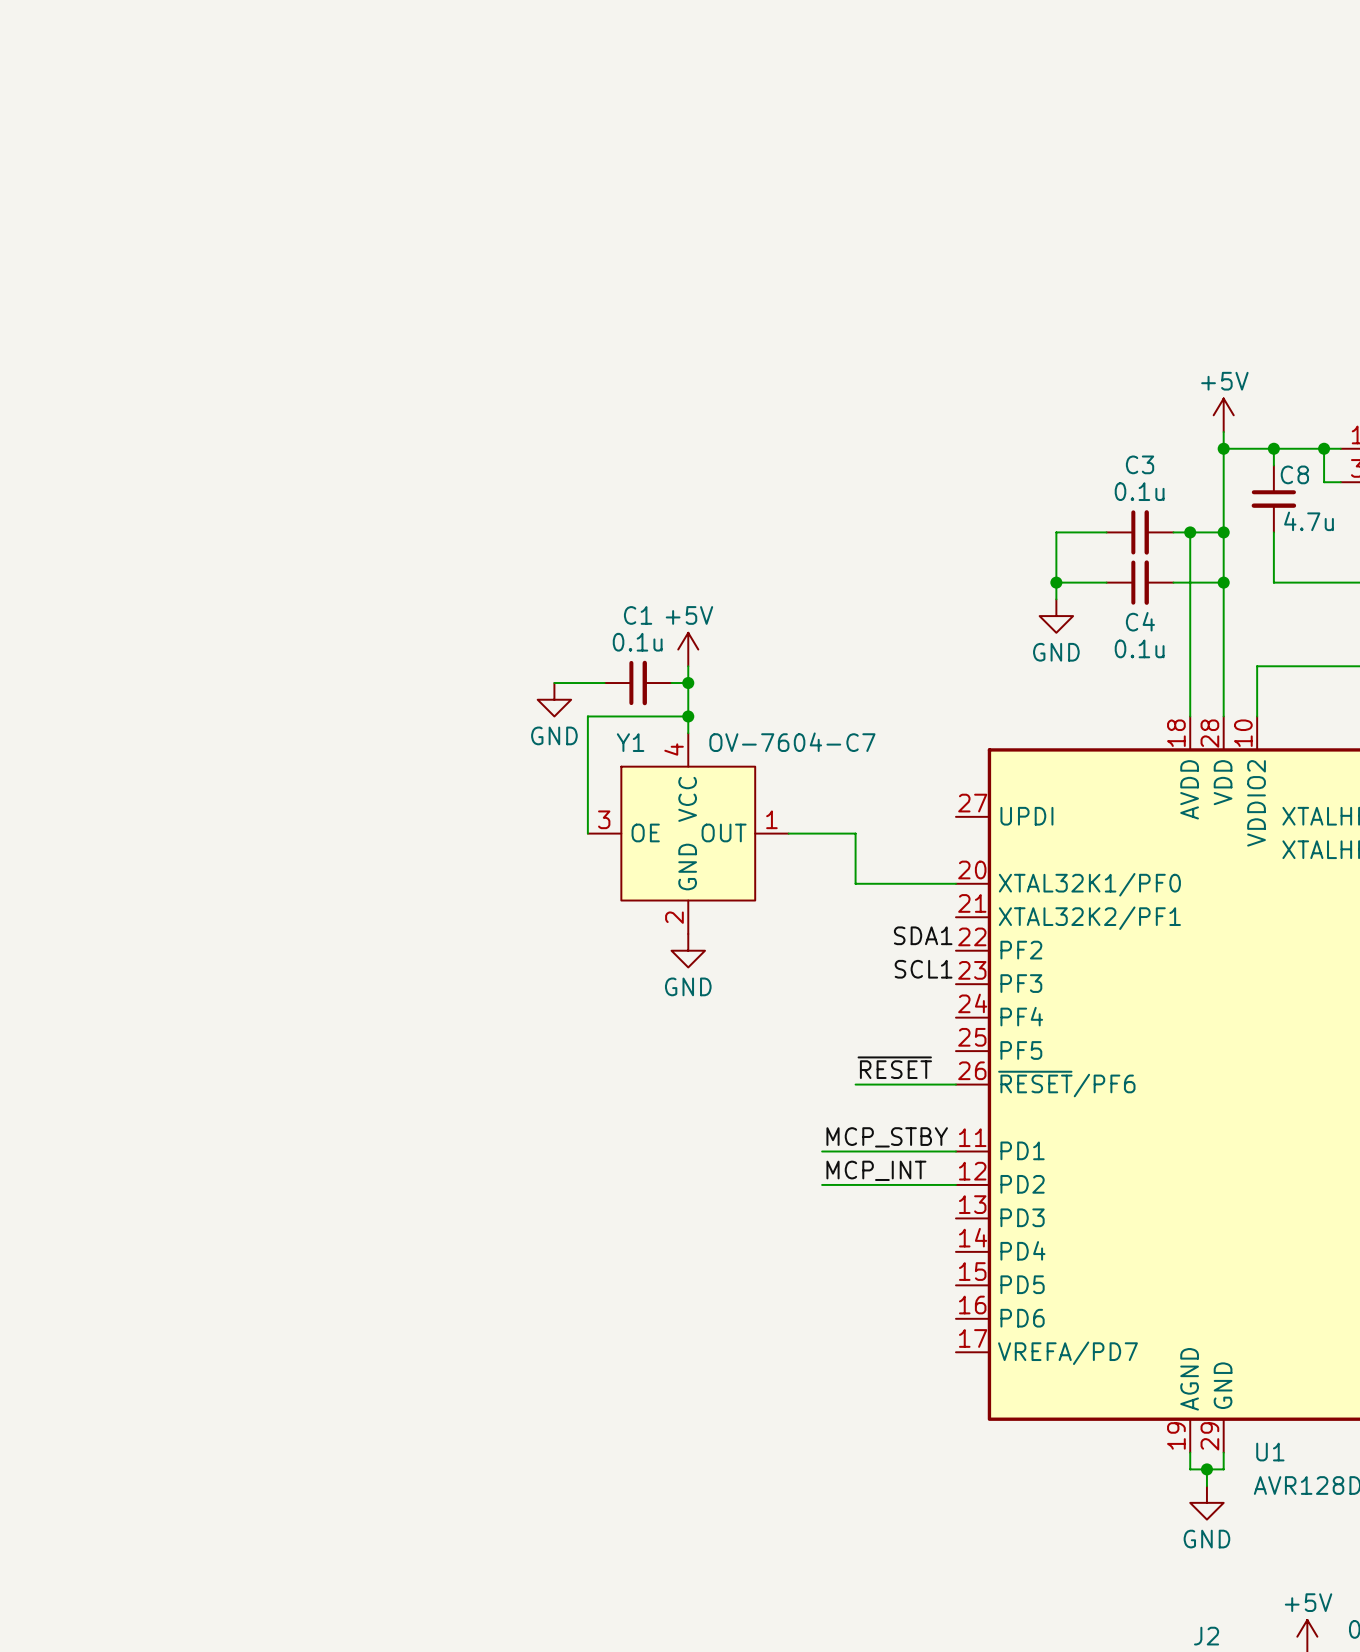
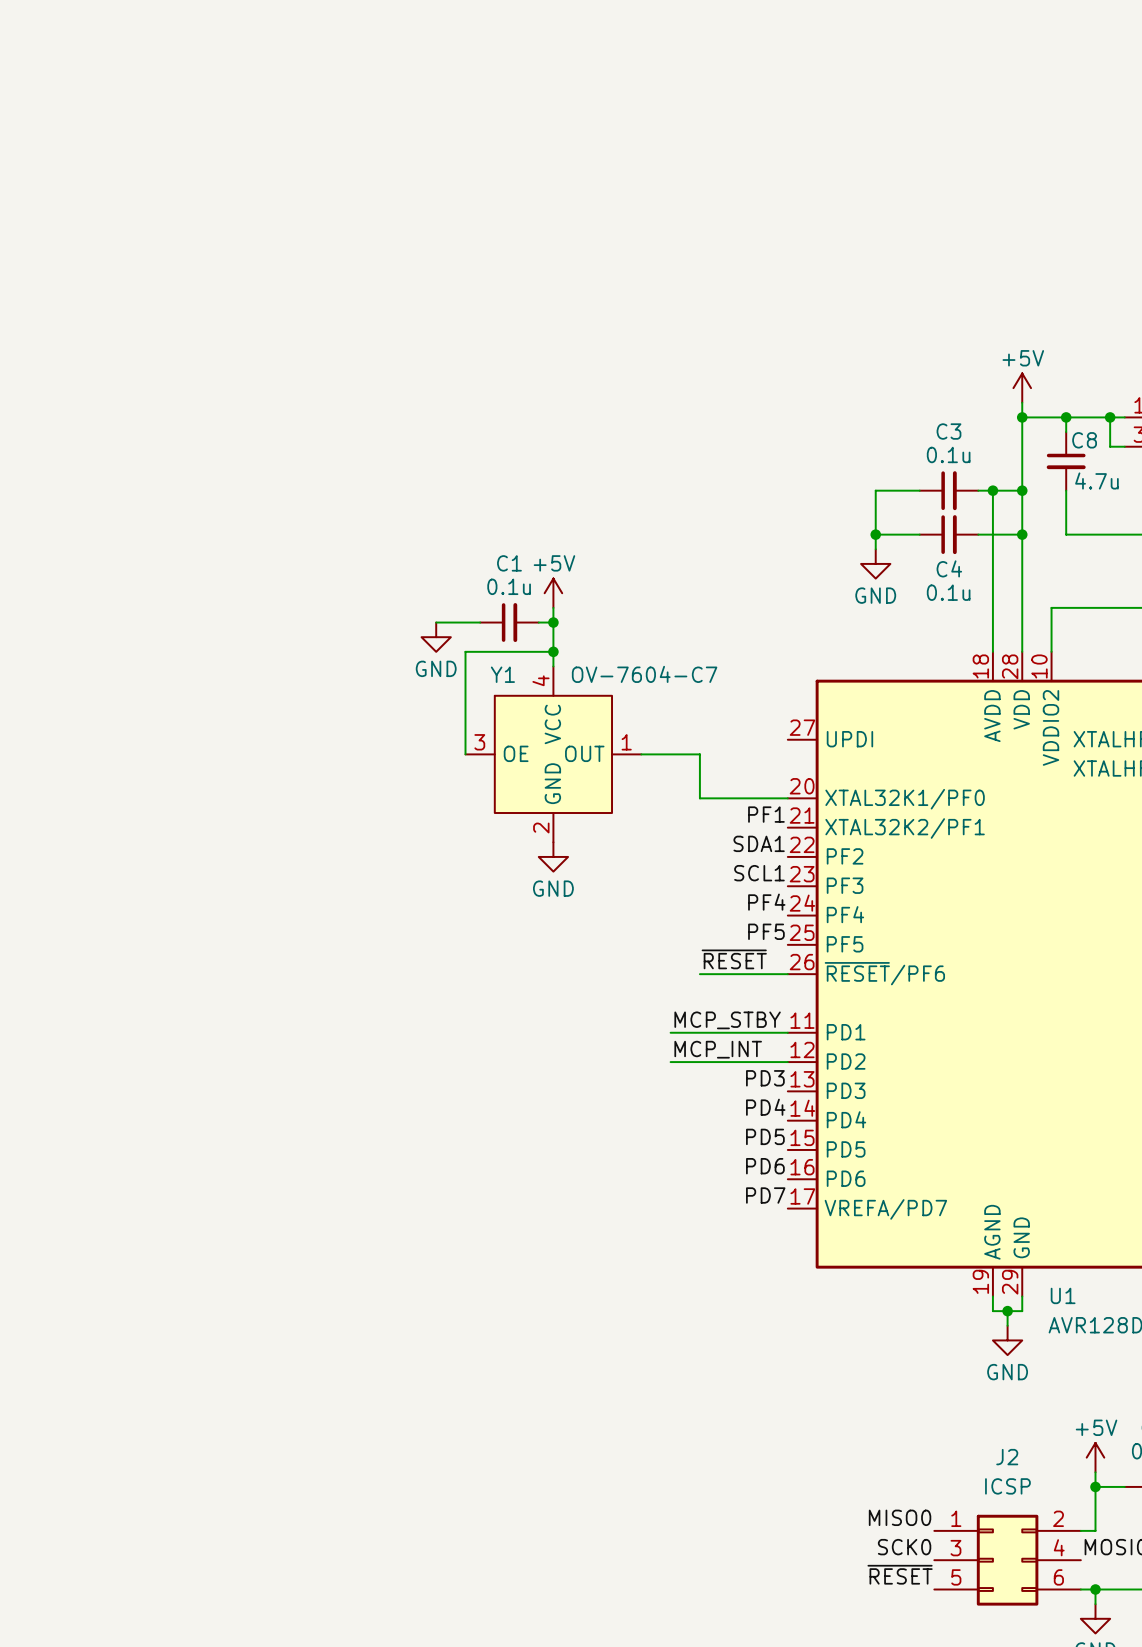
label: none -> PF1 (766, 814)
label: none -> PF4 (766, 902)
label: none -> PF5 (766, 931)
label: none -> PD3 (765, 1078)
label: none -> PD4 (765, 1107)
label: none -> PD5 (765, 1136)
label: none -> PD6 (765, 1166)
label: none -> PD7 (765, 1195)

